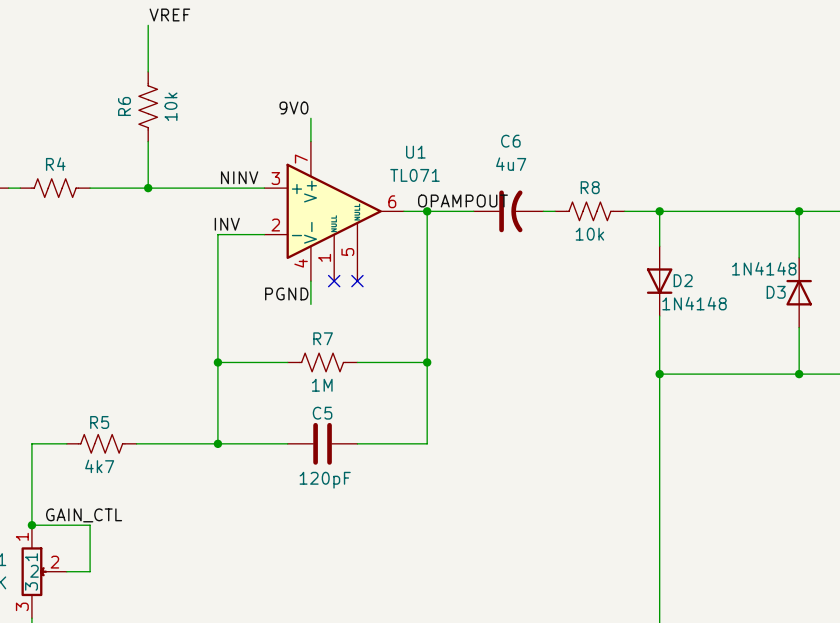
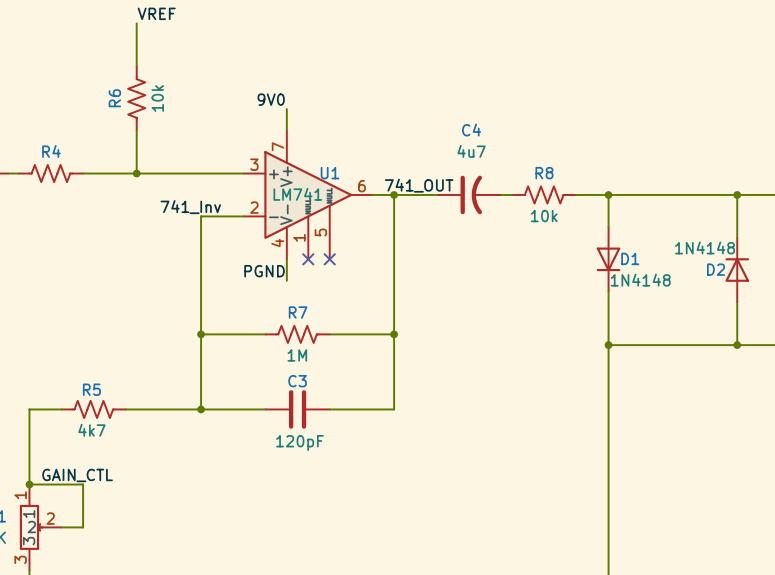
C6 name: C6 (510, 141) -> C4 (471, 129)
U1 name position: U1 (415, 152) -> U1 (329, 173)
U1 value: TL071 (415, 175) -> LM741 (297, 194)
label: NINV (239, 177) -> none
label: OPAMPOUT (462, 200) -> 741_OUT (419, 185)
label: INV (227, 224) -> 741_Inv (190, 207)
D2 name: D2 (683, 280) -> D1 (630, 258)
D3 name: D3 (776, 292) -> D2 (716, 269)
C5 name: C5 (322, 413) -> C3 (297, 381)

